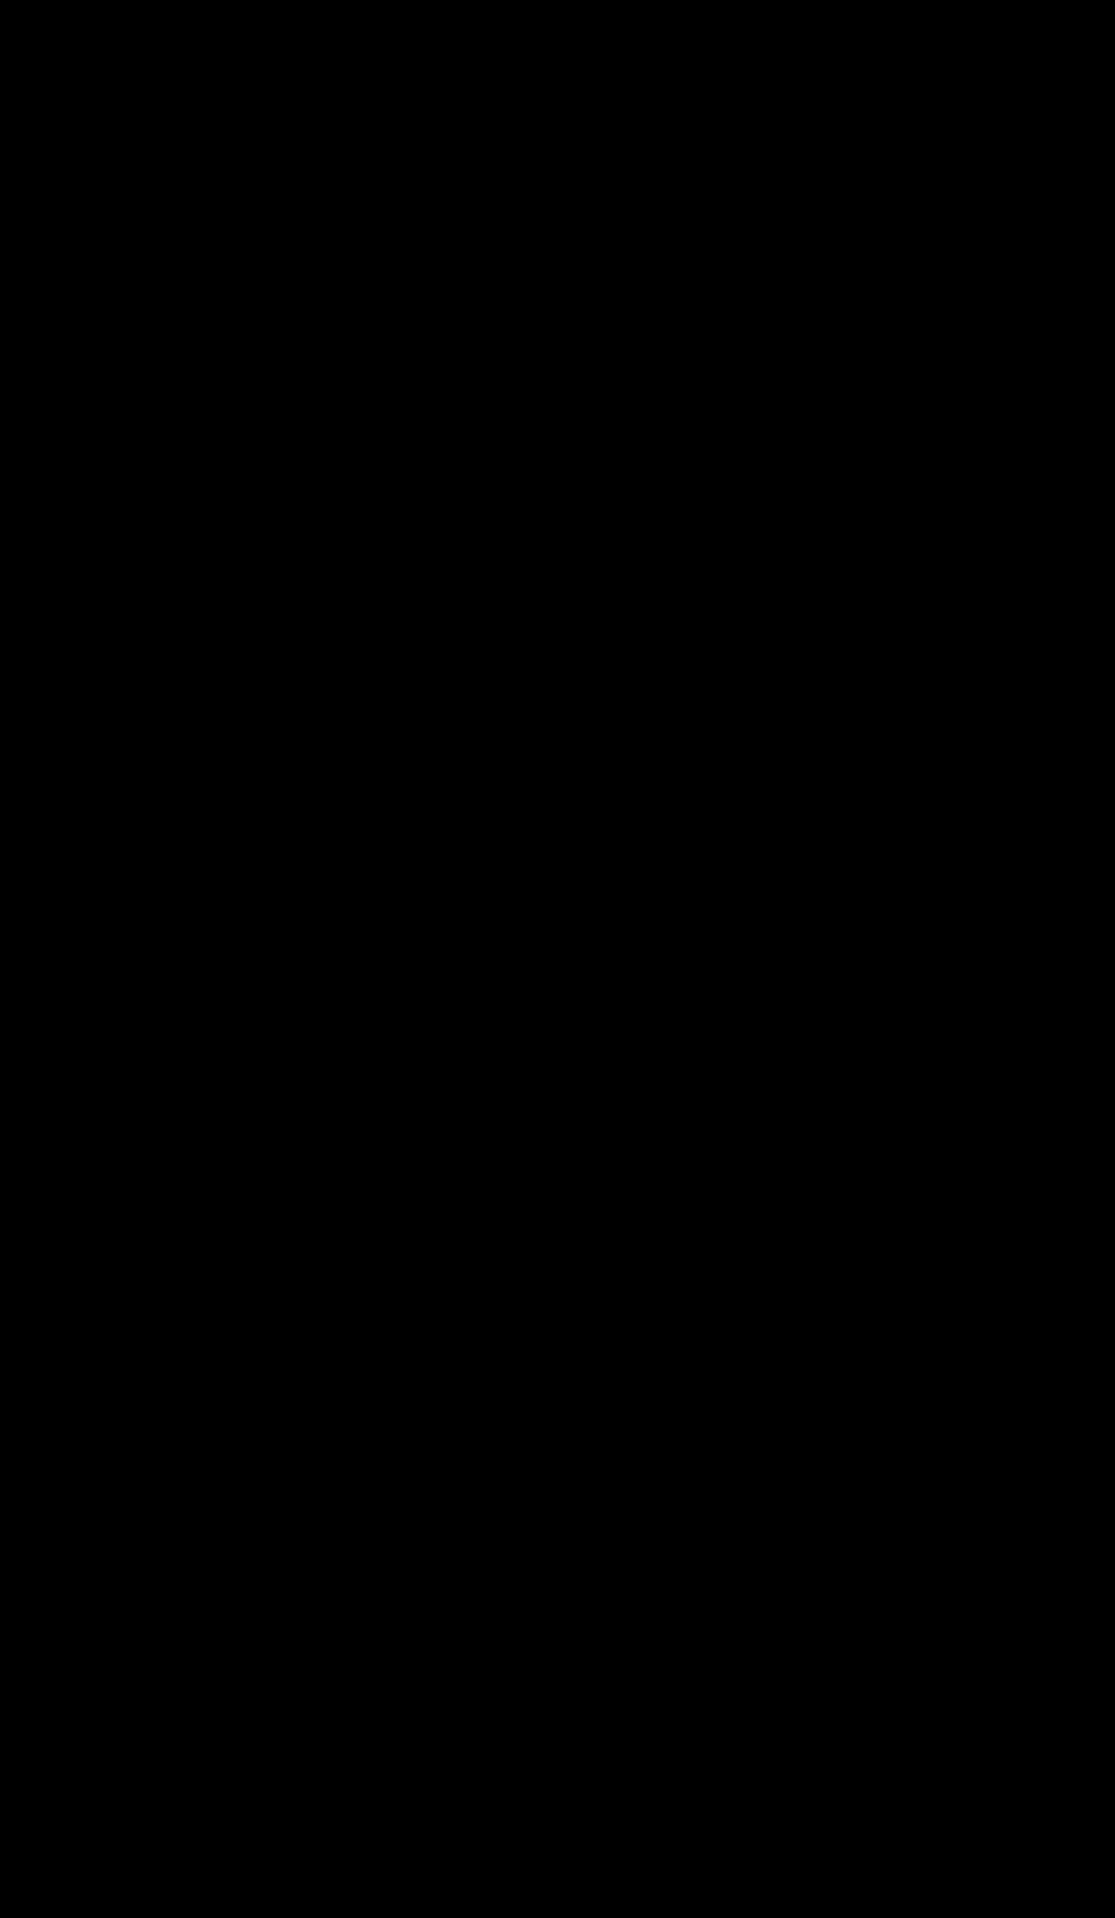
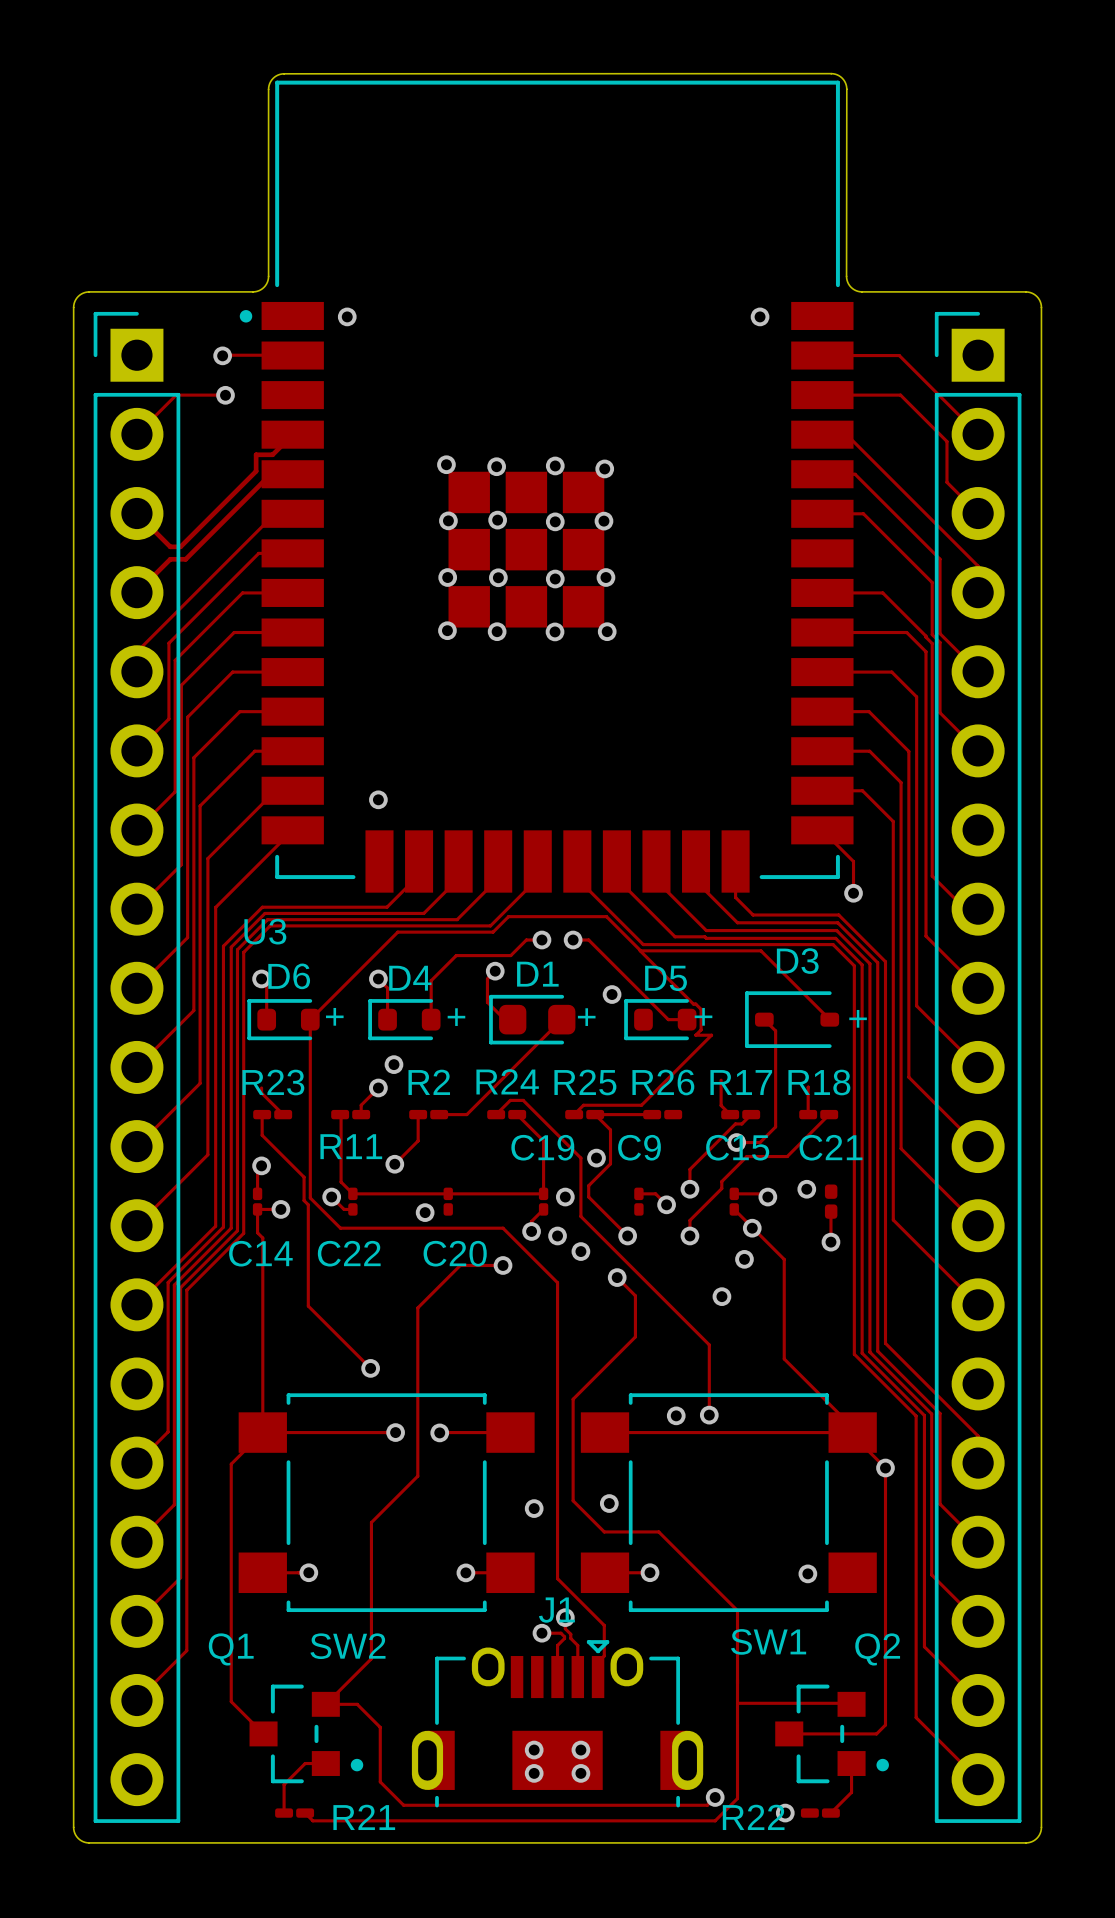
board edge: none -> (831, 73) (280, 74) (273, 78) (268, 87) (268, 276) (264, 287) (253, 291) (87, 292) (79, 295) (74, 301) (73, 1827) (76, 1836) (83, 1841) (1025, 1842) (1033, 1840) (1040, 1833) (1041, 305) (1036, 296) (1027, 292) (862, 291) (851, 287) (846, 276) (846, 87) (842, 78) (831, 73)
via: none -> (347, 316)
via: none -> (760, 316)
via: none -> (222, 355)
track: none -> (292, 355) (222, 355)
track: none -> (822, 355) (899, 355) (978, 434)
track: none -> (225, 395) (176, 395) (136, 434)
via: none -> (225, 395)
track: none -> (822, 395) (900, 395) (946, 441) (946, 482) (978, 513)
track: none -> (292, 434) (272, 454) (256, 454) (256, 471) (180, 546) (170, 546) (136, 513)
track: none -> (822, 434) (846, 434) (978, 566) (978, 592)
via: none -> (446, 464)
via: none -> (555, 465)
via: none -> (496, 466)
via: none -> (604, 468)
track: none -> (292, 474) (270, 474) (185, 559) (170, 559) (136, 592)
track: none -> (822, 474) (855, 474) (940, 559) (940, 633) (978, 671)
U3: none -> (546, 486)
track: none -> (292, 513) (274, 513) (136, 651) (136, 671)
track: none -> (822, 513) (863, 513) (932, 582) (932, 634) (940, 642) (940, 712) (978, 750)
via: none -> (448, 520)
via: none -> (497, 520)
via: none -> (555, 521)
via: none -> (603, 521)
track: none -> (292, 553) (258, 553) (168, 643) (168, 718) (136, 750)
via: none -> (447, 577)
via: none -> (498, 577)
via: none -> (605, 577)
via: none -> (555, 579)
track: none -> (292, 592) (242, 592) (175, 660) (175, 791) (136, 830)
track: none -> (822, 592) (882, 592) (932, 643) (932, 876) (965, 909) (978, 909)
via: none -> (447, 630)
via: none -> (497, 631)
via: none -> (555, 631)
via: none -> (607, 631)
track: none -> (292, 632) (234, 632) (181, 685) (181, 864) (136, 909)
track: none -> (822, 632) (906, 632) (925, 651) (925, 936) (978, 988)
track: none -> (292, 672) (232, 672) (187, 717) (187, 937) (136, 988)
track: none -> (822, 672) (891, 672) (916, 696) (916, 1005) (978, 1067)
track: none -> (292, 711) (239, 711) (193, 757) (193, 1010) (136, 1067)
track: none -> (822, 711) (869, 711) (908, 751) (908, 1077) (978, 1146)
track: none -> (292, 751) (254, 751) (200, 805) (200, 1083) (136, 1146)
track: none -> (822, 751) (869, 751) (901, 782) (901, 1148) (978, 1225)
track: none -> (292, 790) (275, 790) (207, 858) (207, 1154) (136, 1225)
track: none -> (822, 790) (862, 790) (893, 821) (893, 1219) (978, 1304)
via: none -> (378, 799)
track: none -> (292, 830) (215, 907) (215, 1226) (136, 1304)
track: none -> (822, 830) (853, 861) (853, 893)
track: none -> (419, 861) (419, 875) (387, 907) (262, 907) (223, 946) (223, 1227) (168, 1282) (168, 1431) (136, 1463)
track: none -> (458, 861) (458, 878) (423, 913) (264, 913) (231, 947) (231, 1228) (174, 1285) (174, 1504) (136, 1542)
track: none -> (498, 861) (498, 878) (457, 919) (267, 919) (237, 949) (237, 1230) (180, 1287) (180, 1577) (136, 1621)
track: none -> (537, 861) (537, 878) (490, 925) (270, 925) (243, 952) (243, 1233) (186, 1290) (186, 1650) (136, 1700)
track: none -> (577, 861) (577, 878) (643, 944) (833, 944) (854, 965) (854, 1354) (916, 1416) (916, 1717) (978, 1779)
track: none -> (616, 861) (616, 878) (675, 936) (835, 938) (862, 964) (862, 1353) (924, 1415) (924, 1646) (978, 1700)
track: none -> (656, 861) (656, 880) (706, 930) (836, 930) (869, 963) (869, 1352) (931, 1413) (931, 1574) (978, 1621)
track: none -> (696, 861) (696, 881) (737, 922) (837, 922) (877, 962) (877, 1351) (940, 1413) (940, 1504) (978, 1542)
track: none -> (735, 861) (735, 897) (753, 915) (838, 915) (885, 961) (885, 1343) (978, 1436) (978, 1463)
via: none -> (853, 893)
track: none -> (541, 940) (526, 940) (510, 955) (456, 955) (431, 980) (431, 1019)
via: none -> (541, 940)
track: none -> (573, 940) (588, 940) (668, 1019) (687, 1019)
via: none -> (573, 940)
track: none -> (640, 950) (606, 916) (508, 916) (493, 932) (397, 932) (310, 1019) (310, 1198) (340, 1228) (503, 1228) (557, 1282) (557, 1578) (604, 1625) (604, 1656) (598, 1662) (598, 1677)
track: none -> (495, 971) (487, 978) (487, 1002) (504, 1019) (512, 1019)
via: none -> (495, 971)
track: none -> (261, 978) (266, 984) (266, 1019)
via: none -> (261, 978)
track: none -> (378, 978) (387, 988) (387, 1019)
via: none -> (378, 978)
via: none -> (612, 994)
text: none -> + (334, 1016)
text: none -> + (703, 1016)
text: none -> + (456, 1017)
text: none -> + (586, 1017)
text: none -> + (858, 1018)
D6: none -> (283, 1019)
D4: none -> (404, 1019)
D1: none -> (532, 1019)
track: none -> (561, 1019) (466, 1114) (439, 1114)
D5: none -> (660, 1019)
track: none -> (764, 1019) (775, 1030) (775, 1126) (760, 1142) (736, 1142)
D3: none -> (792, 1019)
track: none -> (829, 1019) (760, 950) (640, 950) (701, 1009) (701, 1029) (695, 1035) (711, 1035) (641, 1105) (583, 1105) (574, 1114)
via: none -> (393, 1064)
part: none -> (136, 1067)
part: none -> (978, 1067)
track: none -> (721, 1080) (721, 1105) (730, 1114)
track: none -> (261, 1087) (261, 1092) (283, 1114)
track: none -> (378, 1087) (361, 1105) (361, 1114)
via: none -> (378, 1087)
track: none -> (808, 1087) (808, 1114)
track: none -> (262, 1114) (262, 1135) (304, 1177) (304, 1200) (308, 1204) (308, 1306) (370, 1368)
R23: none -> (272, 1114)
track: none -> (340, 1114) (341, 1182) (352, 1193) (543, 1193) (543, 1140) (517, 1114)
R11: none -> (350, 1114)
track: none -> (418, 1114) (418, 1140) (394, 1164)
R2: none -> (428, 1114)
track: none -> (496, 1114) (510, 1100) (523, 1100) (580, 1158) (580, 1216) (709, 1344) (709, 1415)
R24: none -> (506, 1114)
R25: none -> (584, 1114)
track: none -> (652, 1114) (595, 1114) (610, 1129) (610, 1163) (588, 1185) (588, 1197) (627, 1235)
R26: none -> (662, 1114)
R17: none -> (740, 1114)
track: none -> (751, 1114) (741, 1123) (735, 1123) (689, 1169) (689, 1189)
R18: none -> (818, 1114)
track: none -> (829, 1114) (787, 1156) (746, 1156) (721, 1181) (721, 1188) (689, 1220) (689, 1235)
via: none -> (736, 1142)
via: none -> (596, 1158)
via: none -> (394, 1164)
track: none -> (261, 1165) (257, 1169) (257, 1193)
via: none -> (261, 1165)
via: none -> (689, 1189)
via: none -> (806, 1189)
track: none -> (638, 1193) (655, 1193) (666, 1204)
track: none -> (734, 1193) (764, 1193) (767, 1197)
track: none -> (331, 1197) (344, 1209) (352, 1209)
via: none -> (331, 1197)
via: none -> (565, 1197)
via: none -> (767, 1197)
C14: none -> (257, 1201)
C22: none -> (352, 1201)
C20: none -> (448, 1201)
C19: none -> (543, 1201)
C9: none -> (638, 1201)
C15: none -> (734, 1201)
C21: none -> (831, 1201)
via: none -> (666, 1204)
track: none -> (280, 1209) (257, 1209) (257, 1232) (262, 1238) (262, 1432)
via: none -> (280, 1209)
track: none -> (543, 1209) (531, 1221) (531, 1231)
track: none -> (734, 1209) (784, 1259) (784, 1358) (852, 1427) (852, 1435) (885, 1468) (885, 1725) (876, 1733) (789, 1733)
track: none -> (830, 1211) (830, 1242)
via: none -> (425, 1212)
via: none -> (752, 1228)
via: none -> (531, 1231)
via: none -> (557, 1235)
via: none -> (627, 1235)
via: none -> (689, 1235)
via: none -> (830, 1242)
via: none -> (580, 1251)
via: none -> (744, 1259)
track: none -> (503, 1265) (460, 1265) (417, 1307) (417, 1476) (371, 1522) (371, 1658) (325, 1704) (357, 1704) (380, 1727) (380, 1781) (403, 1805) (707, 1805) (715, 1797)
via: none -> (503, 1265)
track: none -> (617, 1277) (635, 1295) (635, 1336) (573, 1399) (573, 1500) (604, 1531) (658, 1531) (737, 1610) (737, 1798) (715, 1820) (312, 1820) (305, 1813)
via: none -> (617, 1277)
via: none -> (721, 1296)
via: none -> (370, 1368)
via: none -> (676, 1415)
via: none -> (709, 1415)
track: none -> (262, 1432) (231, 1464) (231, 1701) (263, 1733)
track: none -> (262, 1432) (395, 1432)
via: none -> (395, 1432)
via: none -> (439, 1432)
track: none -> (440, 1432) (510, 1432)
track: none -> (604, 1432) (852, 1432)
via: none -> (885, 1468)
SW2: none -> (386, 1502)
SW1: none -> (728, 1502)
via: none -> (609, 1503)
via: none -> (534, 1508)
via: none -> (308, 1572)
via: none -> (465, 1572)
via: none -> (650, 1572)
via: none -> (807, 1573)
track: none -> (565, 1617) (565, 1628) (577, 1645) (577, 1677)
via: none -> (565, 1617)
track: none -> (541, 1633) (560, 1633) (564, 1636) (557, 1645) (557, 1677)
via: none -> (541, 1633)
track: none -> (737, 1703) (851, 1704)
J1: none -> (557, 1723)
Q1: none -> (306, 1733)
Q2: none -> (832, 1733)
via: none -> (534, 1750)
via: none -> (580, 1750)
track: none -> (325, 1763) (305, 1763) (284, 1784) (284, 1813)
track: none -> (851, 1763) (851, 1792) (830, 1813)
via: none -> (534, 1773)
via: none -> (580, 1773)
via: none -> (715, 1797)
R21: none -> (294, 1813)
via: none -> (785, 1813)
R22: none -> (820, 1813)

